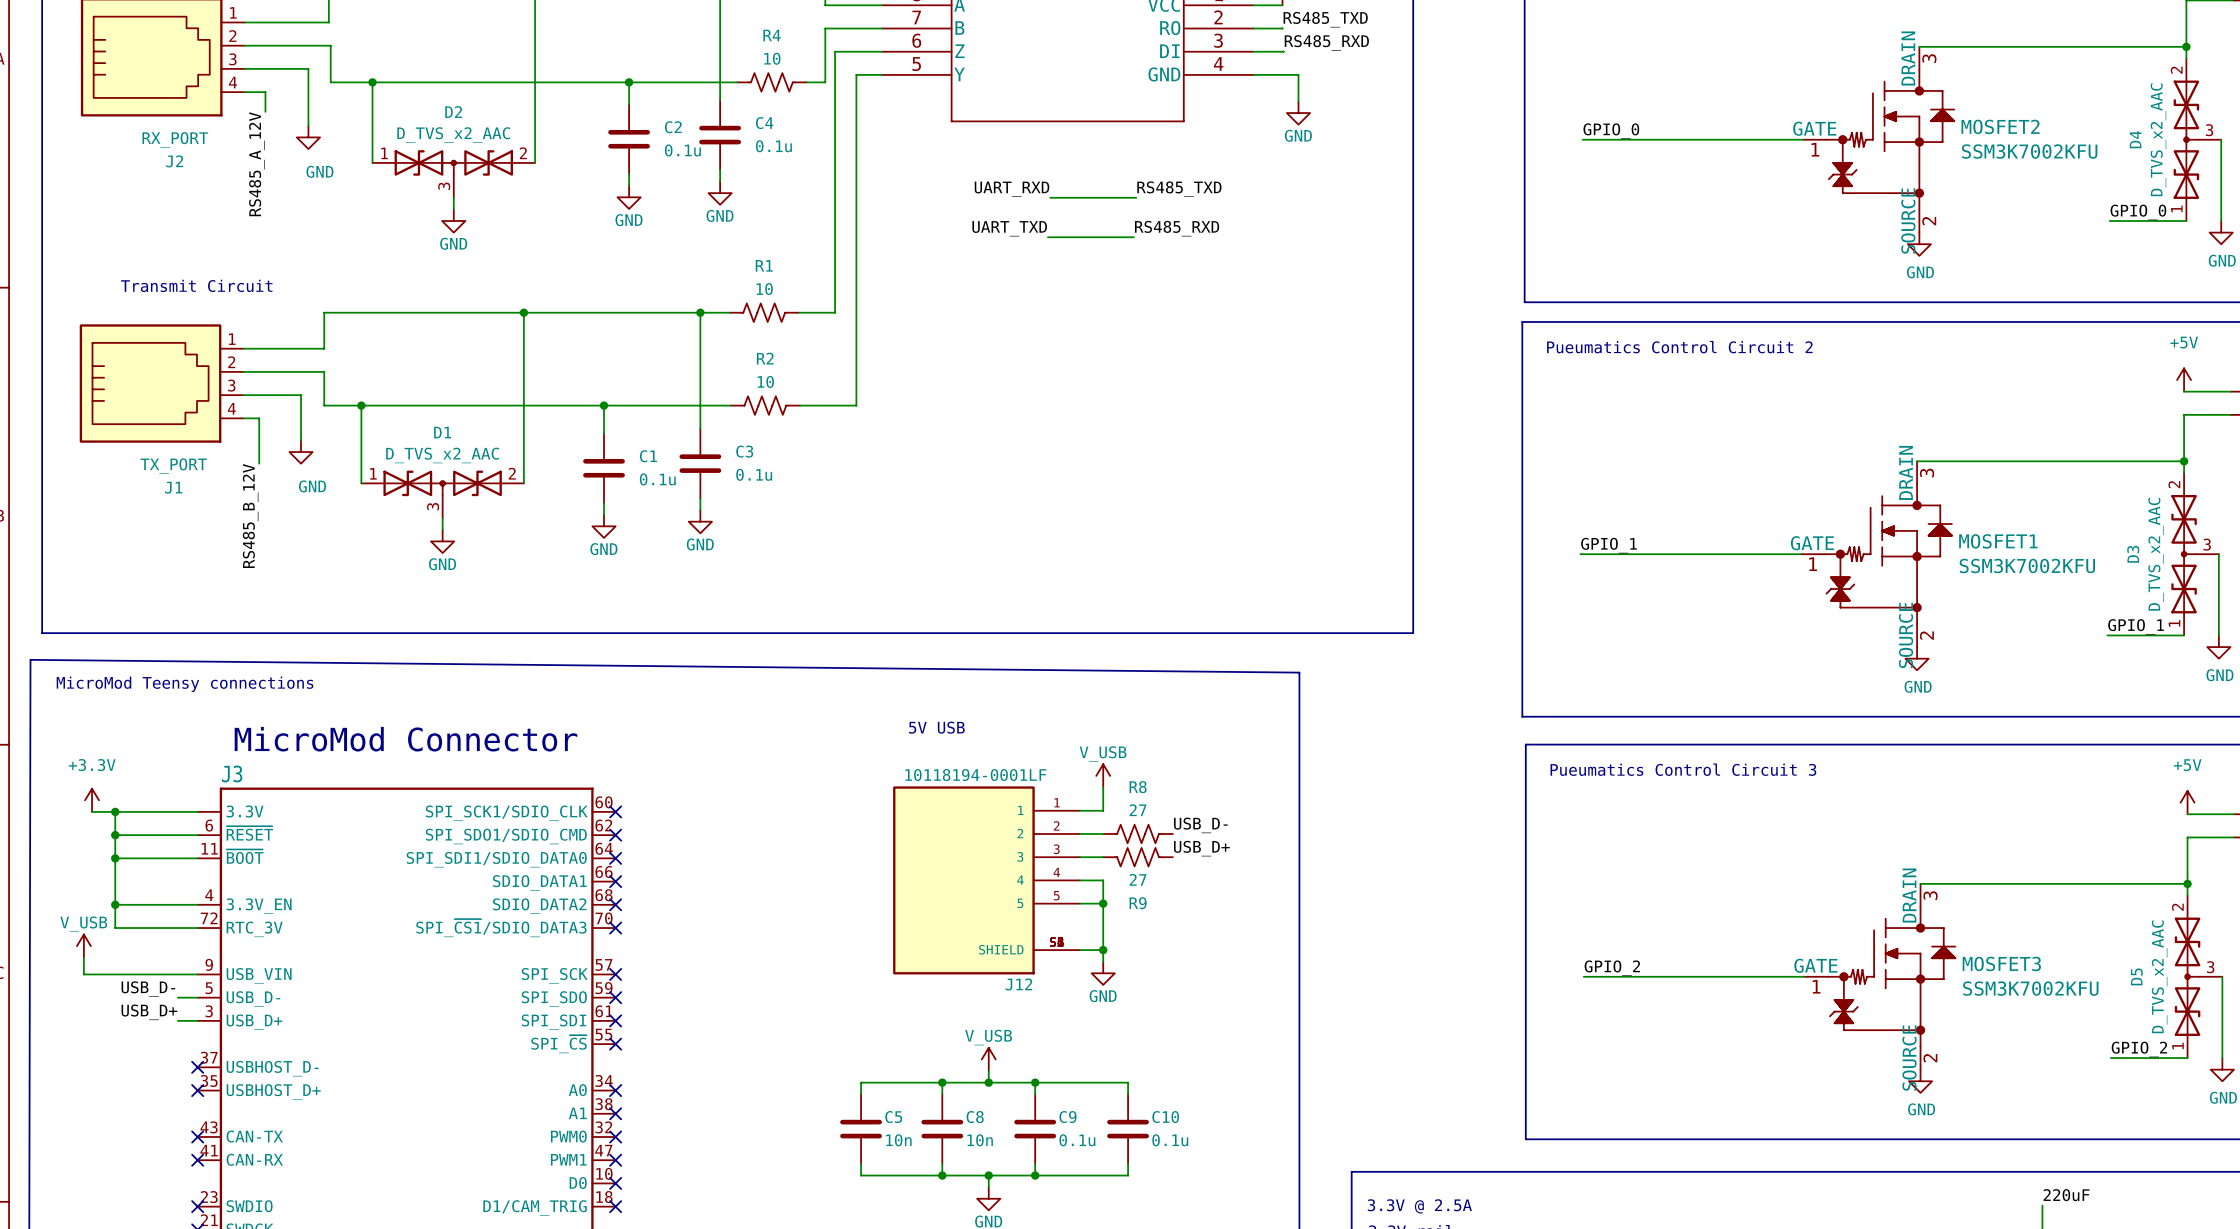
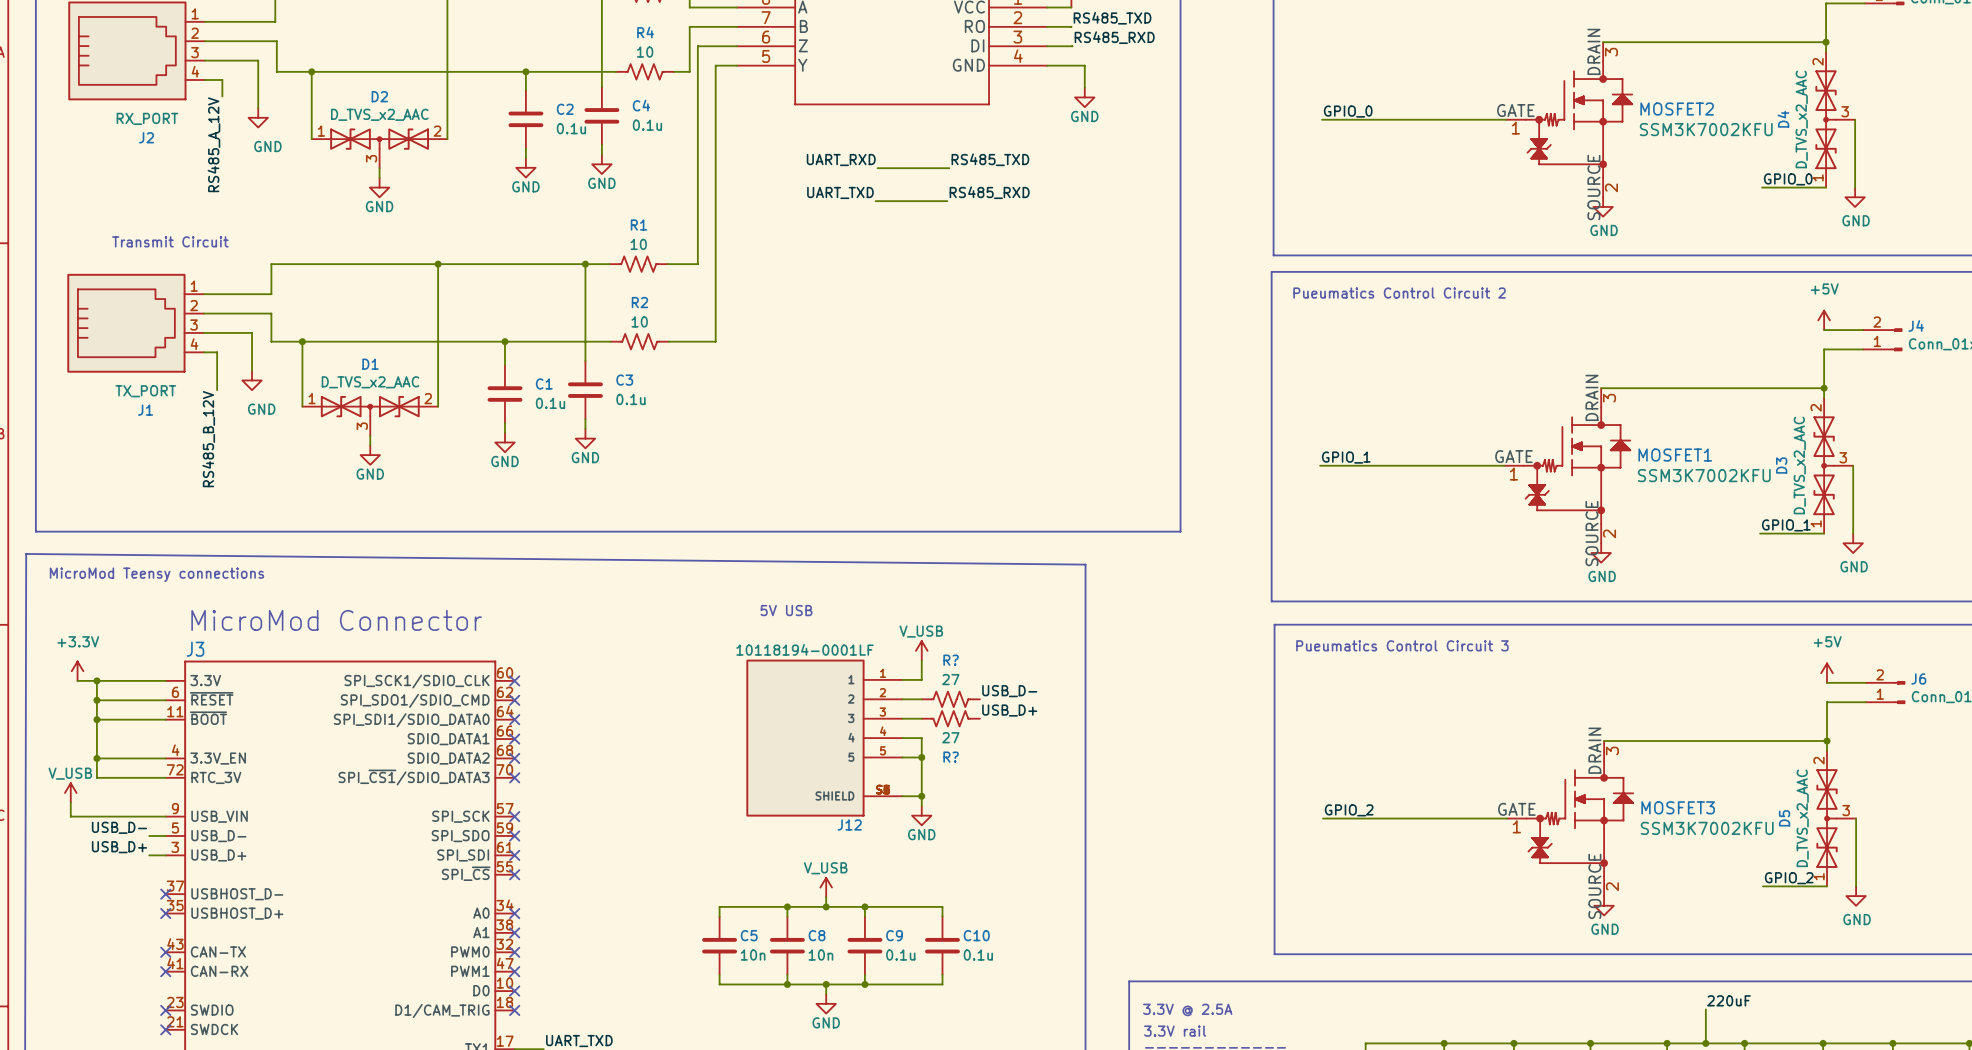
R8 name: R8 (1138, 787) -> R? (951, 660)
R9 name: R9 (1138, 903) -> R? (951, 757)

